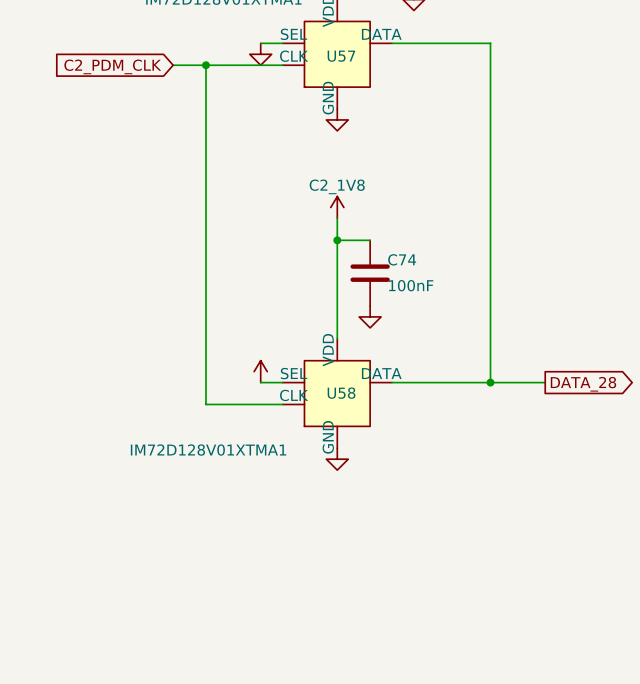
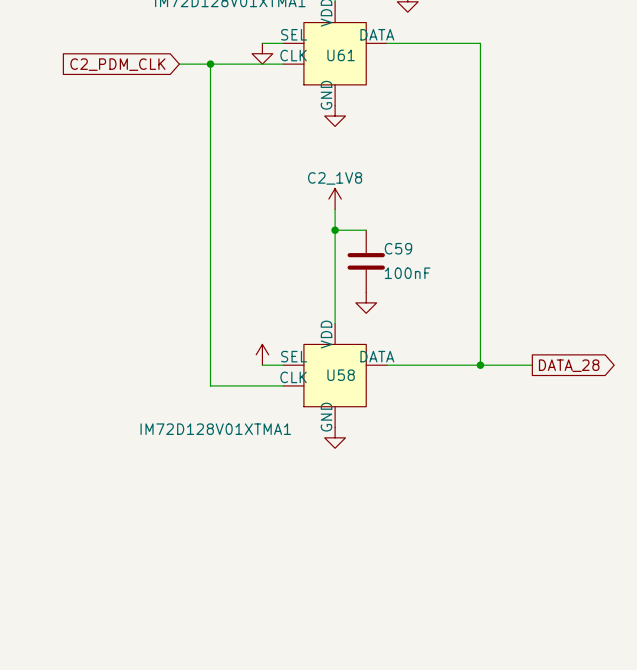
U57 name: U57 (341, 56) -> U61 (341, 55)
C74 name: C74 (402, 259) -> C59 (398, 248)

